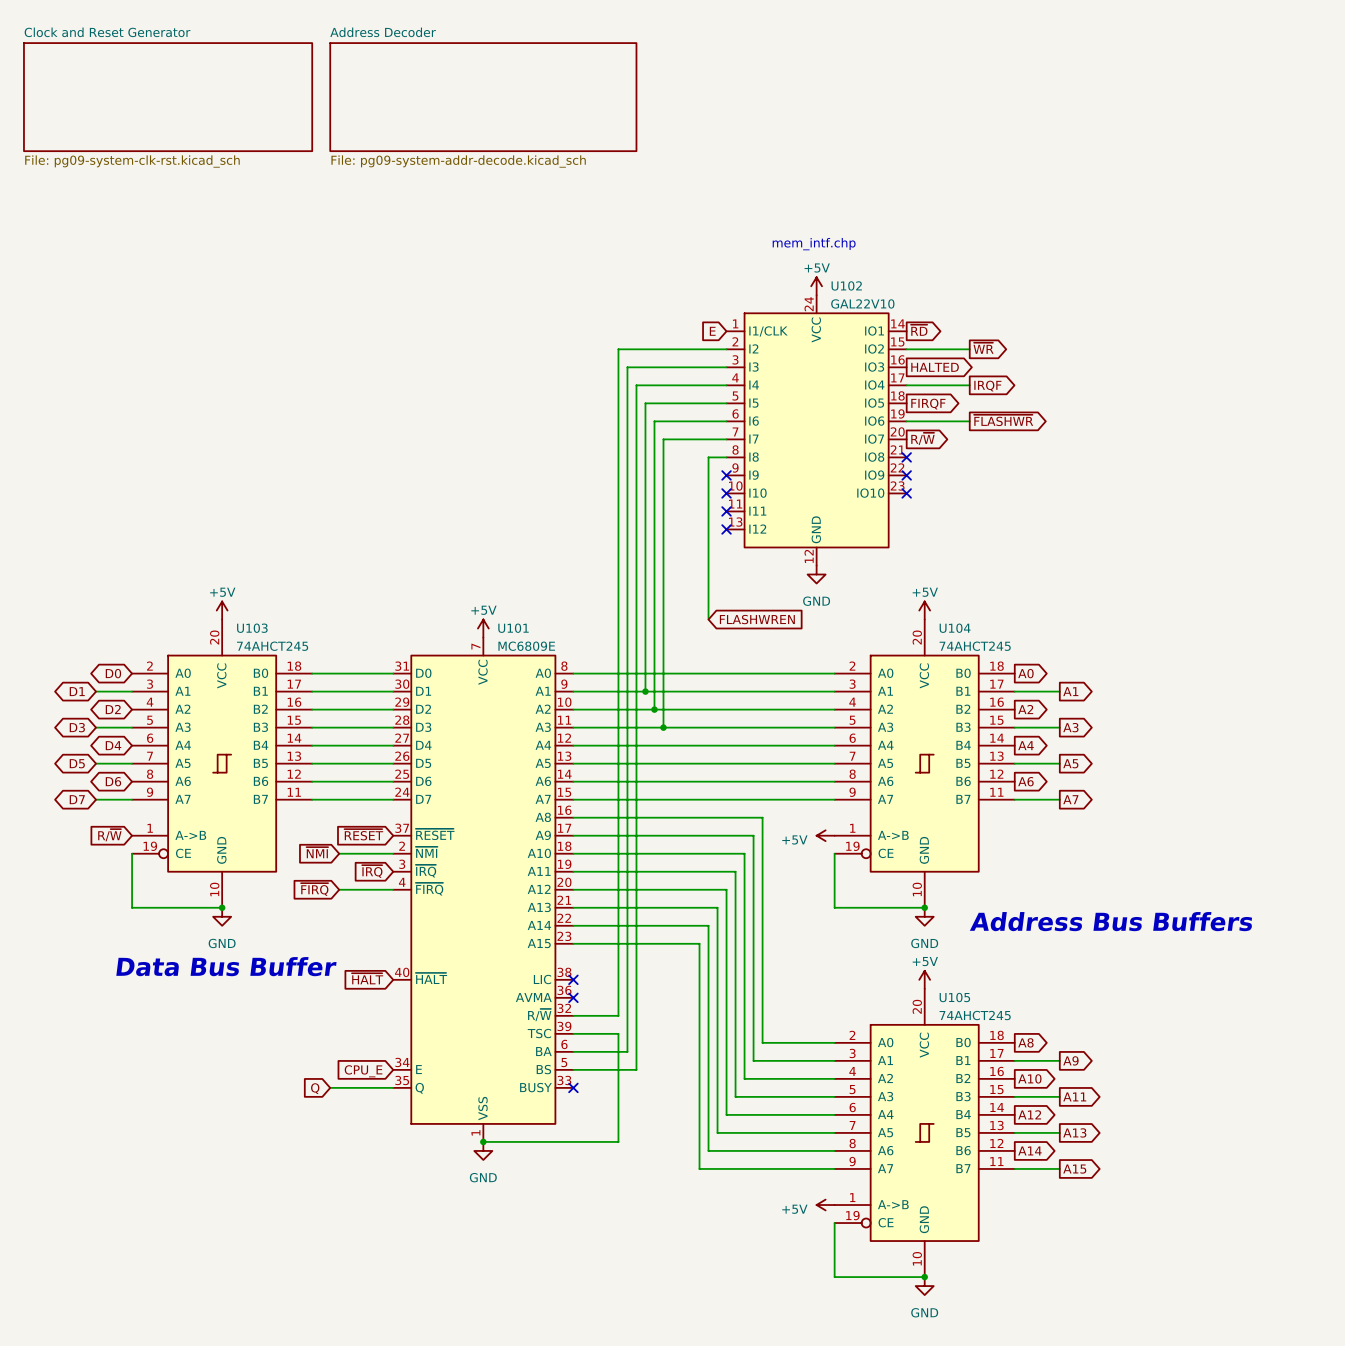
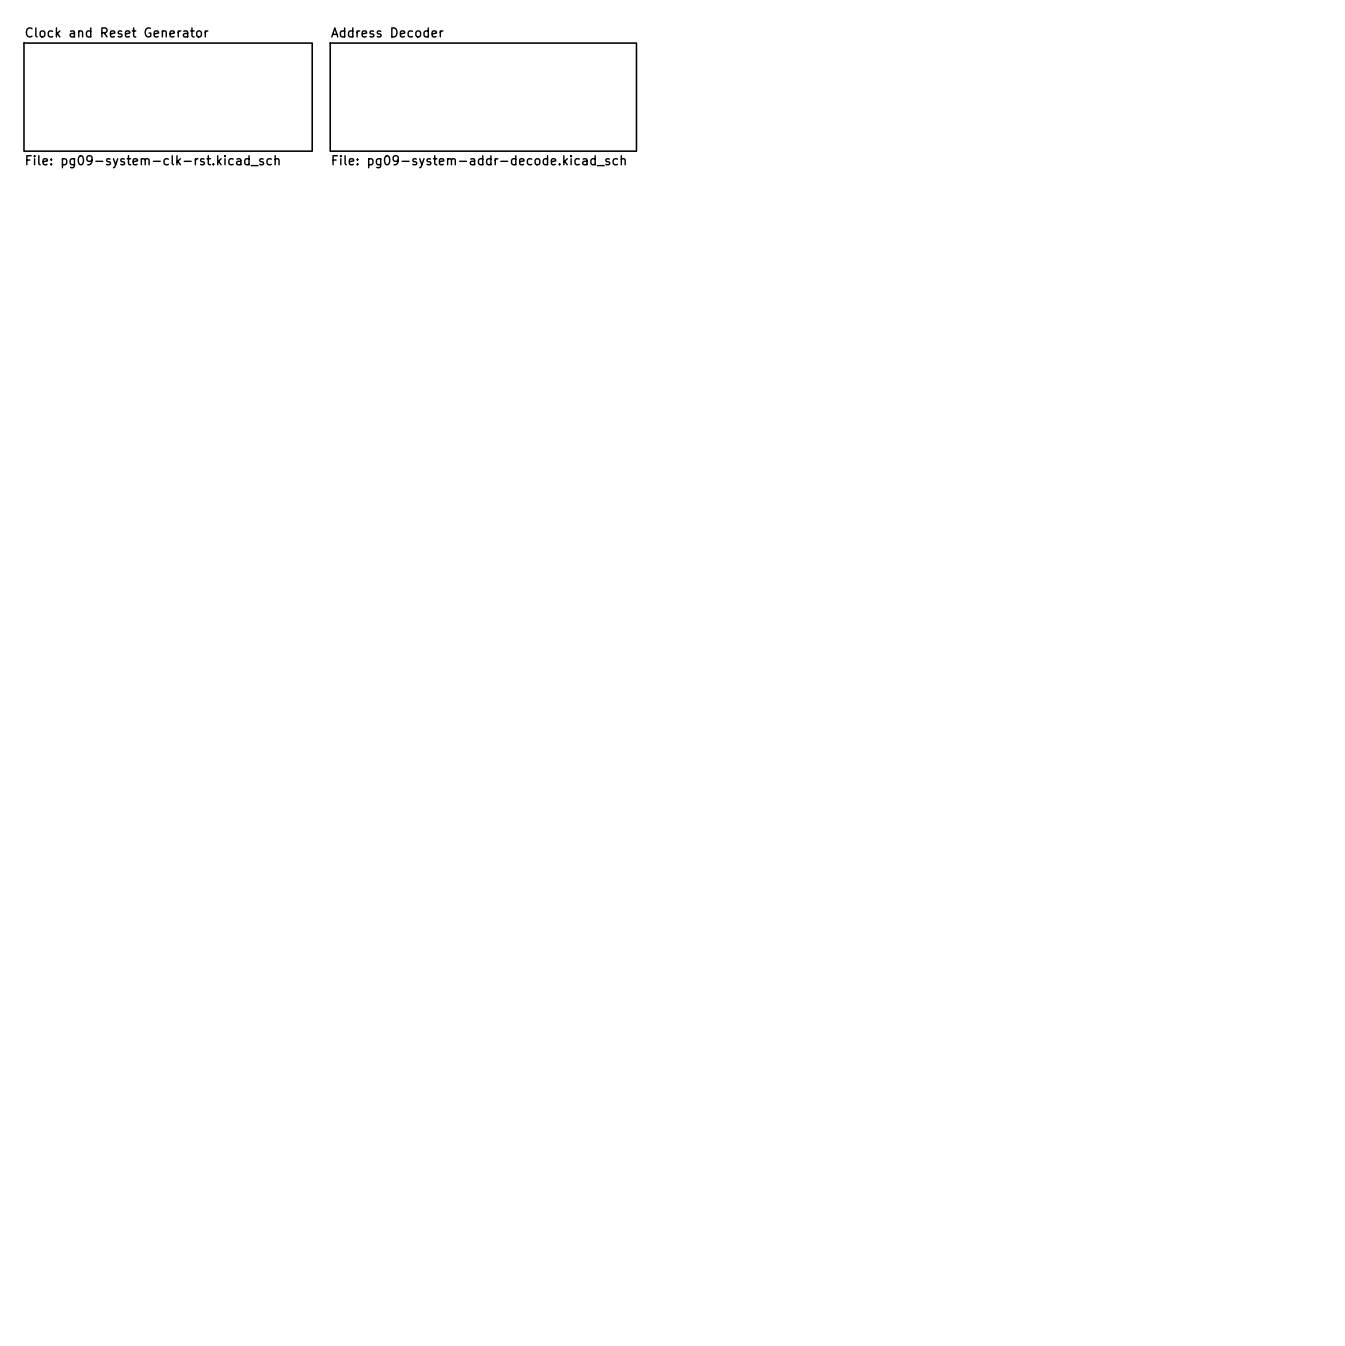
text: mem_intf.chp (814, 244) -> none
power symbol: +5V (816, 286) -> none
global label: ~{RD} (919, 330) -> none
global label: E (712, 331) -> none
global label: ~{WR} (983, 348) -> none
wire: (726, 349) (618, 349) (618, 1015) (573, 1015) -> none
wire: (906, 349) (969, 349) -> none
wire: (726, 367) (627, 367) (627, 1051) (573, 1051) -> none
global label: HALTED (935, 367) -> none
wire: (726, 385) (636, 385) (636, 1069) (573, 1069) -> none
wire: (906, 385) (969, 385) -> none
global label: IRQF (987, 386) -> none
wire: (726, 403) (645, 403) (645, 691) -> none
global label: FIRQF (928, 404) -> none
global label: ~{FLASHWR} (1003, 420) -> none
wire: (726, 421) (654, 421) (654, 709) -> none
wire: (906, 421) (969, 421) -> none
U102: GAL22V10 (816, 430) -> none
global label: R/~{W} (922, 438) -> none
wire: (726, 439) (663, 439) (663, 727) -> none
wire: (726, 457) (708, 457) (708, 619) -> none
no-connect mark: (906, 457) -> none
no-connect mark: (726, 475) -> none
no-connect mark: (906, 475) -> none
no-connect mark: (726, 493) -> none
no-connect mark: (906, 493) -> none
no-connect mark: (726, 511) -> none
no-connect mark: (726, 529) -> none
power symbol: GND (816, 574) -> none
power symbol: +5V (222, 610) -> none
power symbol: +5V (924, 610) -> none
global label: FLASHWREN (757, 619) -> none
power symbol: +5V (483, 628) -> none
global label: D0 (113, 673) -> none
wire: (312, 673) (393, 673) -> none
wire: (573, 673) (834, 673) -> none
global label: A0 (1025, 673) -> none
global label: D1 (77, 691) -> none
wire: (96, 691) (132, 691) -> none
wire: (312, 691) (393, 691) -> none
wire: (573, 691) (834, 691) -> none
junction: (645, 691) -> none
wire: (1014, 691) (1059, 691) -> none
global label: A1 (1070, 691) -> none
global label: D2 (113, 709) -> none
wire: (312, 709) (393, 709) -> none
wire: (573, 709) (834, 709) -> none
junction: (654, 709) -> none
global label: A2 (1025, 709) -> none
global label: D3 (77, 727) -> none
wire: (96, 727) (132, 727) -> none
wire: (312, 727) (393, 727) -> none
wire: (573, 727) (834, 727) -> none
junction: (663, 727) -> none
wire: (1014, 727) (1059, 727) -> none
global label: A3 (1070, 727) -> none
global label: D4 (113, 745) -> none
wire: (312, 745) (393, 745) -> none
wire: (573, 745) (834, 745) -> none
global label: A4 (1026, 745) -> none
global label: D5 (77, 763) -> none
wire: (96, 763) (132, 763) -> none
U103: 74AHCT245 (222, 763) -> none
wire: (312, 763) (393, 763) -> none
wire: (573, 763) (834, 763) -> none
U104: 74AHCT245 (924, 763) -> none
wire: (1014, 763) (1059, 763) -> none
global label: A5 (1070, 763) -> none
global label: D6 (113, 781) -> none
wire: (312, 781) (393, 781) -> none
wire: (573, 781) (834, 781) -> none
global label: A6 (1025, 781) -> none
global label: D7 (77, 799) -> none
wire: (96, 799) (132, 799) -> none
wire: (312, 799) (393, 799) -> none
wire: (573, 799) (834, 799) -> none
wire: (1014, 799) (1059, 799) -> none
global label: A7 (1070, 799) -> none
wire: (573, 817) (762, 817) (762, 1042) (834, 1042) -> none
global label: ~{RESET} (363, 834) -> none
global label: R/~{W} (109, 835) -> none
wire: (573, 835) (753, 835) (753, 1060) (834, 1060) -> none
power symbol: +5V (825, 835) -> none
global label: ~{NMI} (317, 852) -> none
wire: (132, 853) (132, 907) (222, 907) -> none
wire: (339, 853) (393, 853) -> none
wire: (573, 853) (744, 853) (744, 1078) (834, 1078) -> none
wire: (834, 853) (834, 907) (924, 907) -> none
global label: ~{IRQ} (372, 871) -> none
wire: (573, 871) (735, 871) (735, 1096) (834, 1096) -> none
global label: ~{FIRQ} (314, 889) -> none
wire: (339, 889) (393, 889) -> none
U101: MC6809E (483, 889) -> none
wire: (573, 889) (726, 889) (726, 1114) (834, 1114) -> none
junction: (222, 907) -> none
wire: (573, 907) (717, 907) (717, 1132) (834, 1132) -> none
junction: (924, 907) -> none
power symbol: GND (222, 916) -> none
power symbol: GND (924, 916) -> none
text: Address Bus Buffers (1110, 921) -> none
wire: (573, 925) (708, 925) (708, 1150) (834, 1150) -> none
wire: (573, 943) (699, 943) (699, 1168) (834, 1168) -> none
text: Data Bus Buffer (226, 966) -> none
global label: ~{HALT} (367, 978) -> none
no-connect mark: (573, 979) -> none
power symbol: +5V (924, 979) -> none
no-connect mark: (573, 997) -> none
wire: (573, 1033) (618, 1033) (618, 1141) (483, 1141) -> none
global label: A8 (1025, 1042) -> none
wire: (1014, 1060) (1059, 1060) -> none
global label: A9 (1070, 1060) -> none
global label: CPU_E (363, 1071) -> none
global label: A10 (1029, 1078) -> none
wire: (330, 1087) (393, 1087) -> none
no-connect mark: (573, 1087) -> none
global label: Q (315, 1088) -> none
wire: (1014, 1096) (1059, 1096) -> none
global label: A11 (1074, 1096) -> none
global label: A12 (1029, 1114) -> none
U105: 74AHCT245 (924, 1132) -> none
wire: (1014, 1132) (1059, 1132) -> none
global label: A13 (1074, 1132) -> none
junction: (483, 1141) -> none
power symbol: GND (483, 1150) -> none
global label: A14 (1029, 1150) -> none
wire: (1014, 1168) (1059, 1168) -> none
global label: A15 (1074, 1169) -> none
power symbol: +5V (825, 1205) -> none
wire: (834, 1223) (834, 1277) (924, 1277) -> none
junction: (924, 1277) -> none
power symbol: GND (924, 1286) -> none

